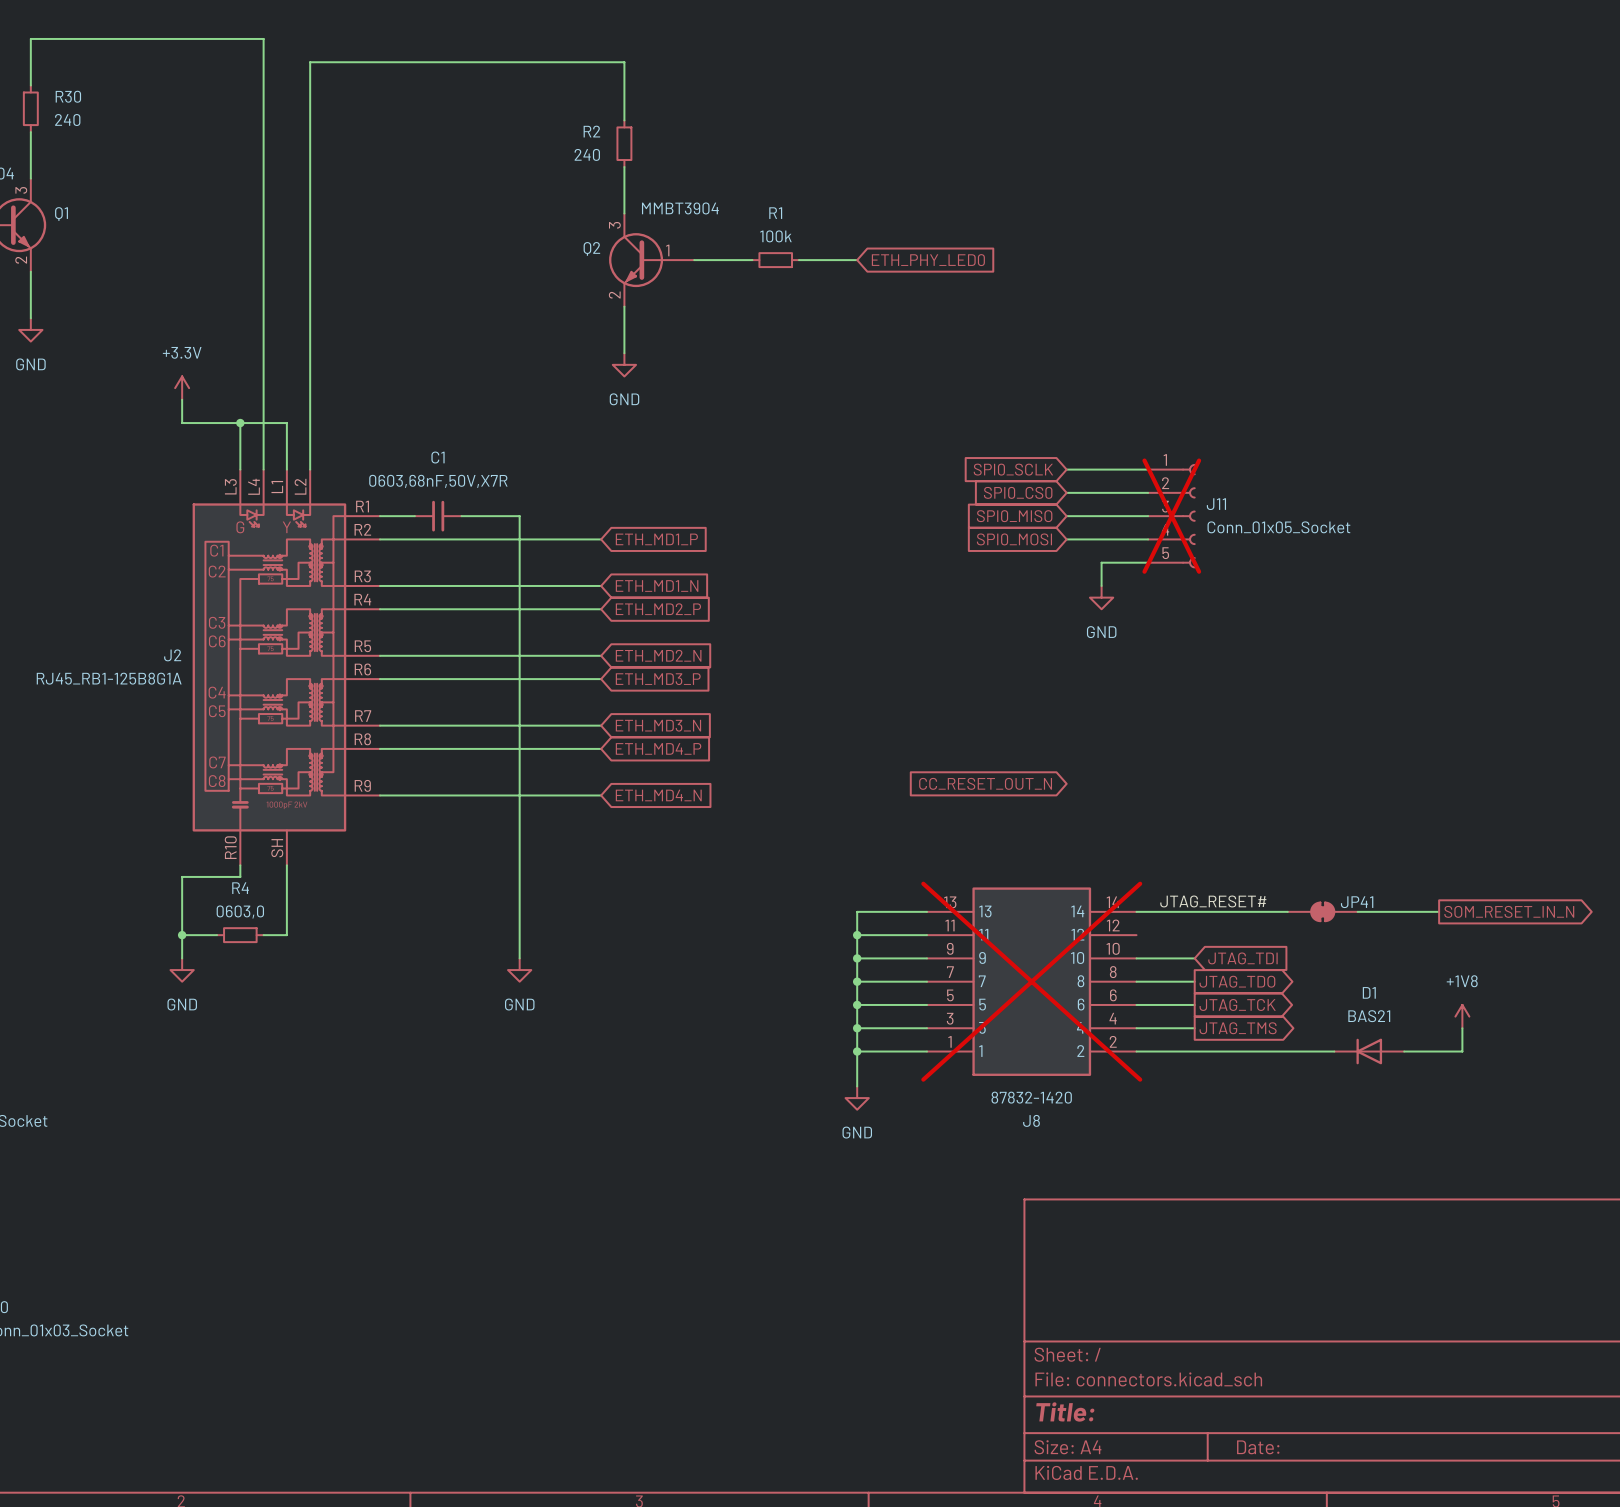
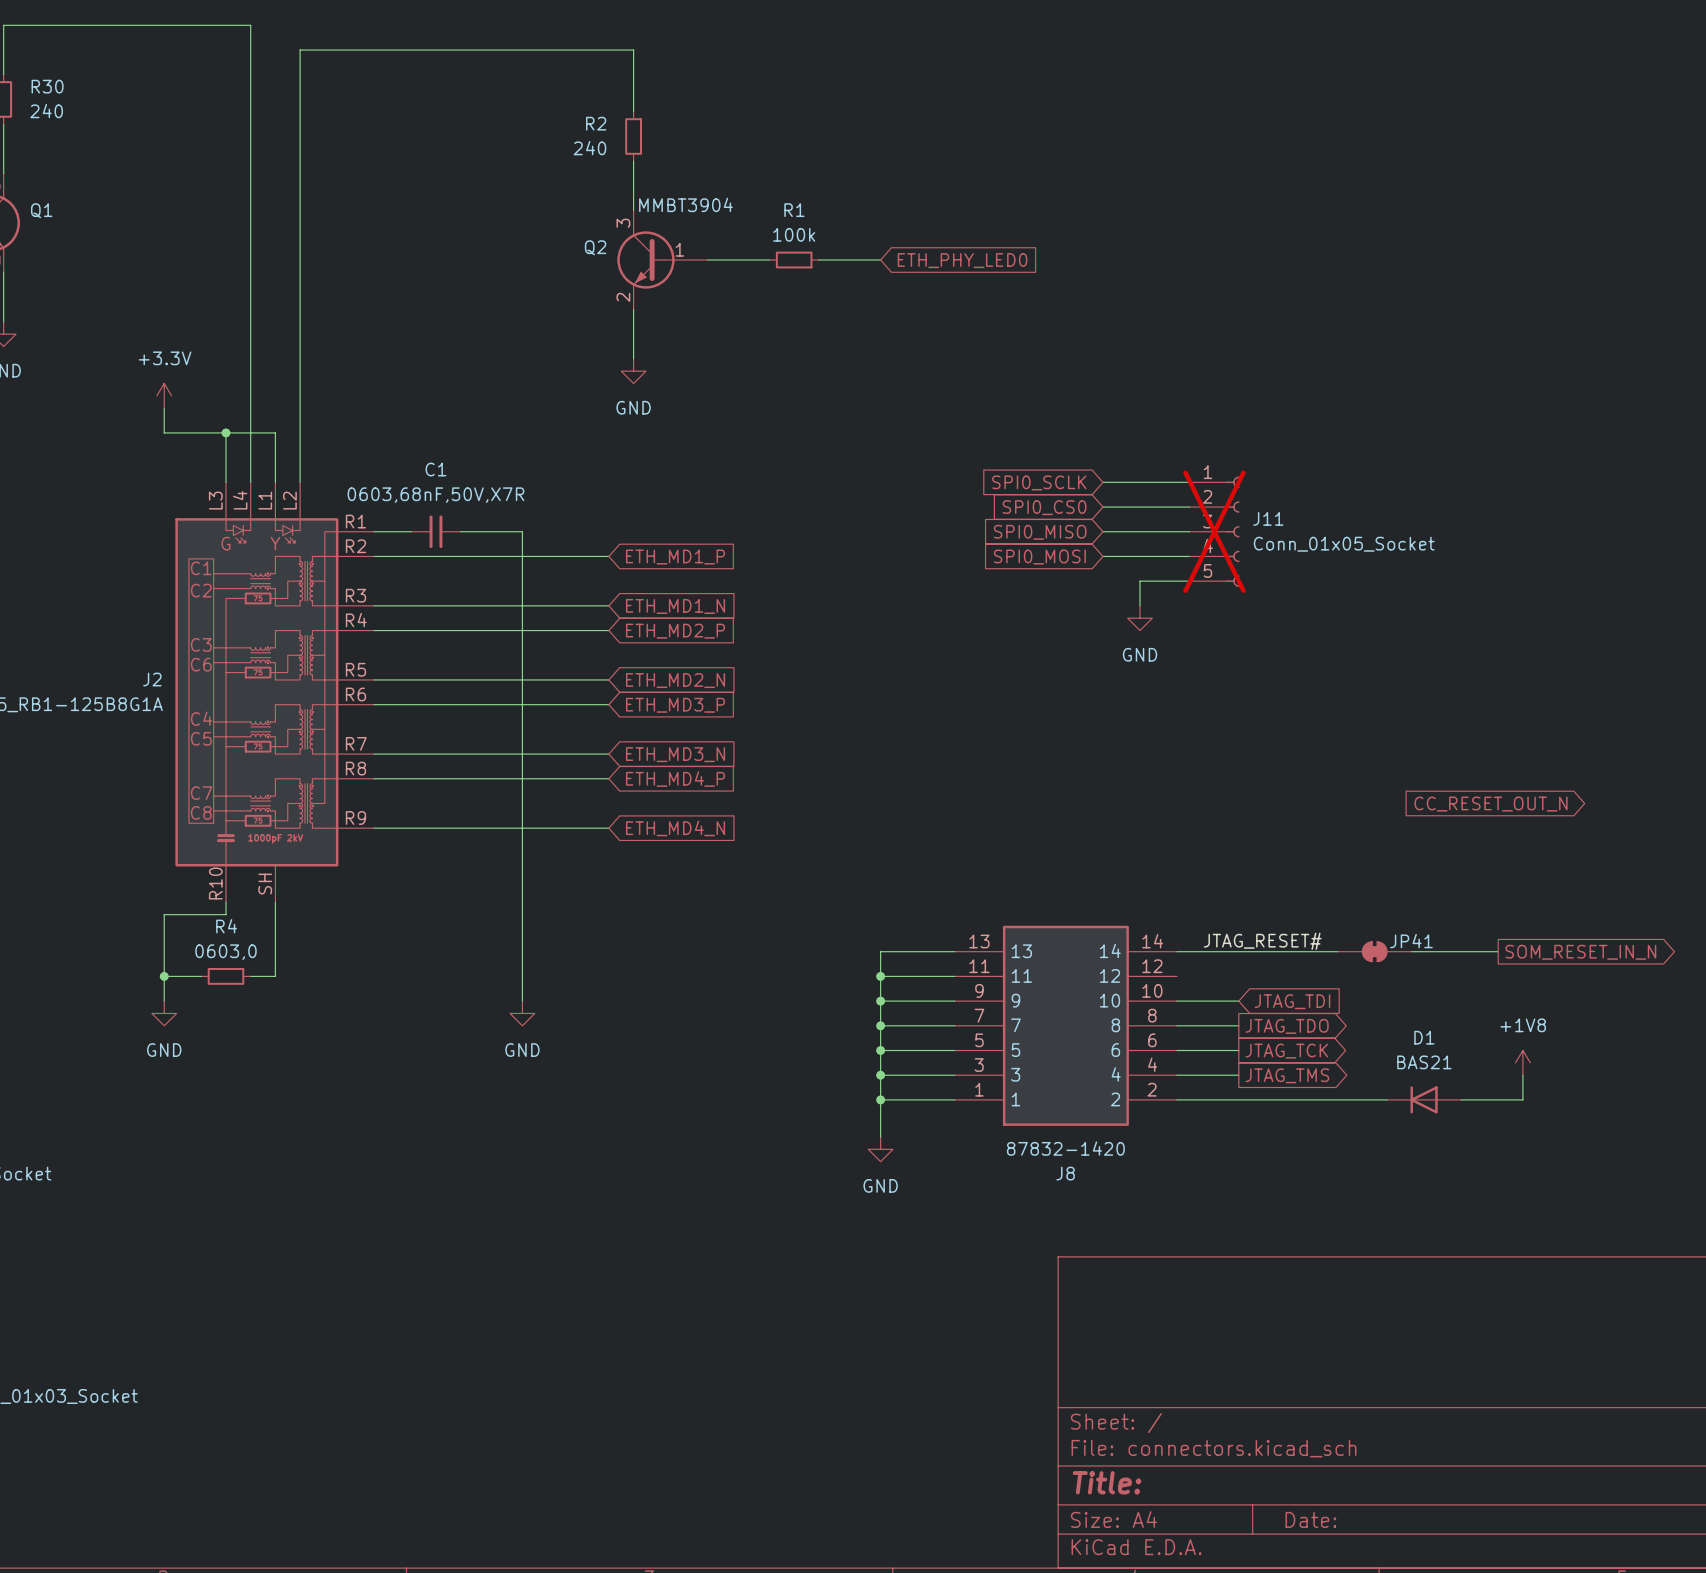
global label: none -> CC_RESET_OUT_N (1490, 804)
global label: CC_RESET_OUT_N (985, 783) -> none
J8 do-not-place cross: (1031, 981) -> none

